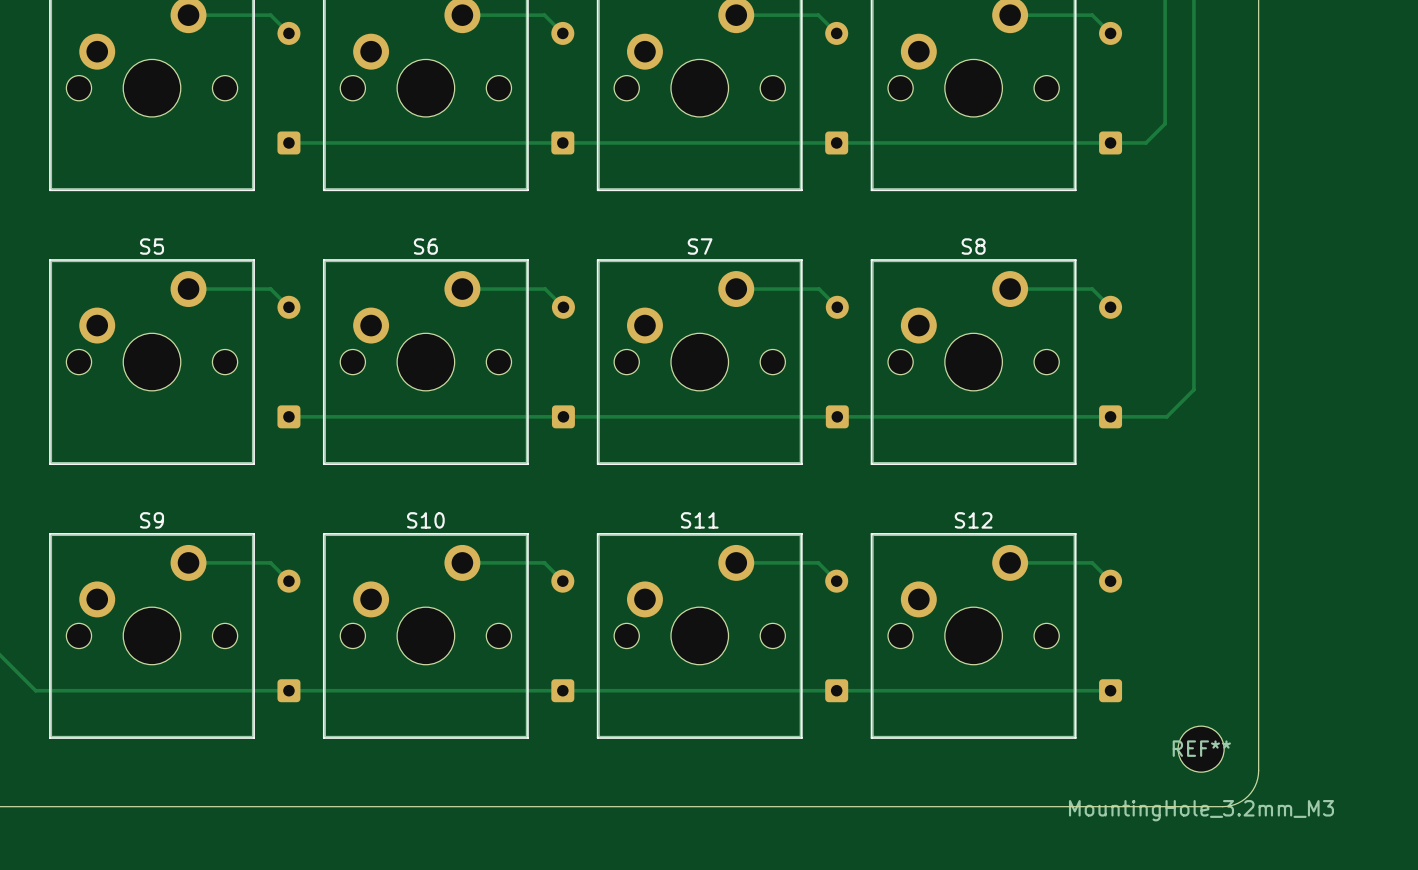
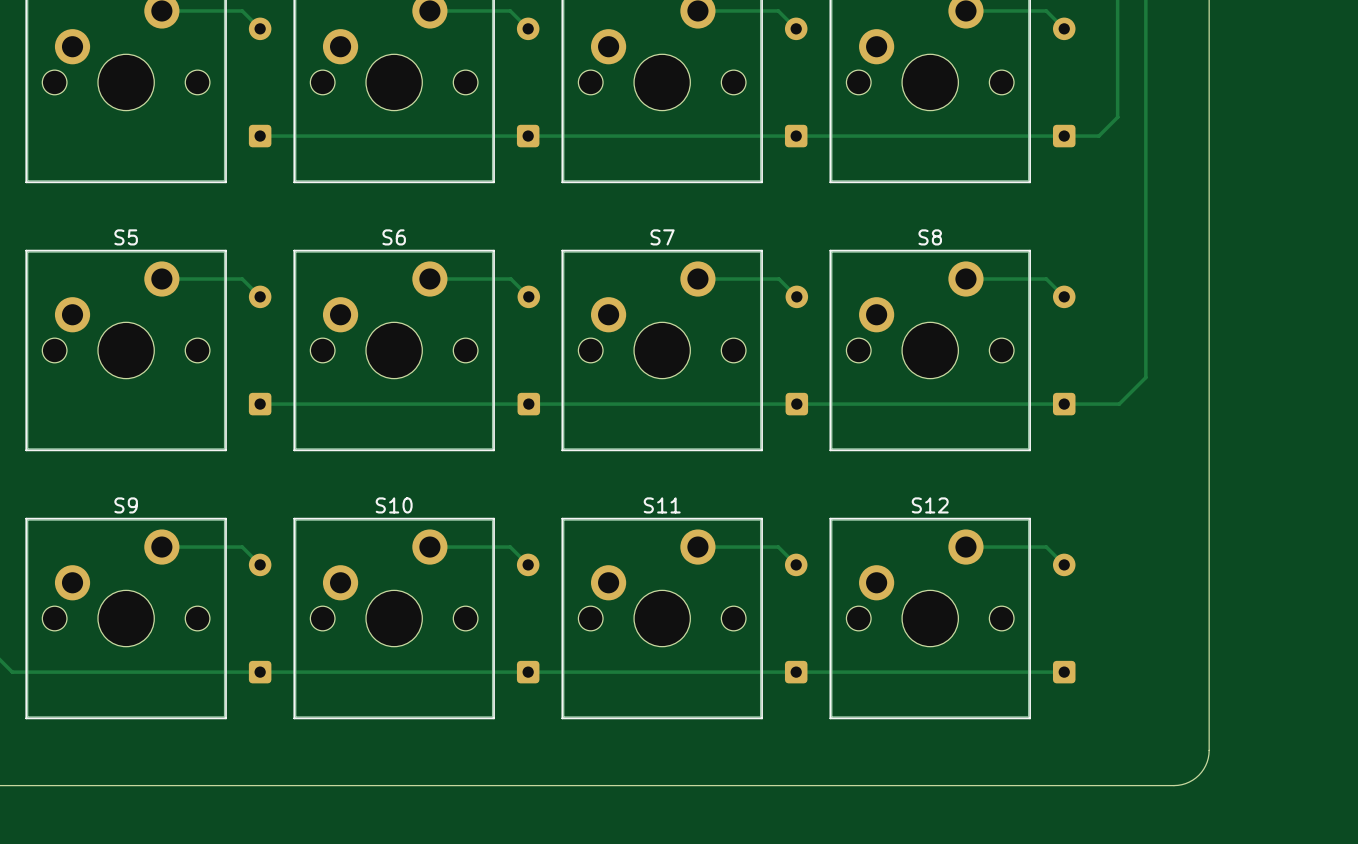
REF**: MountingHole_3.2mm_M3 (1201, 749) -> none

